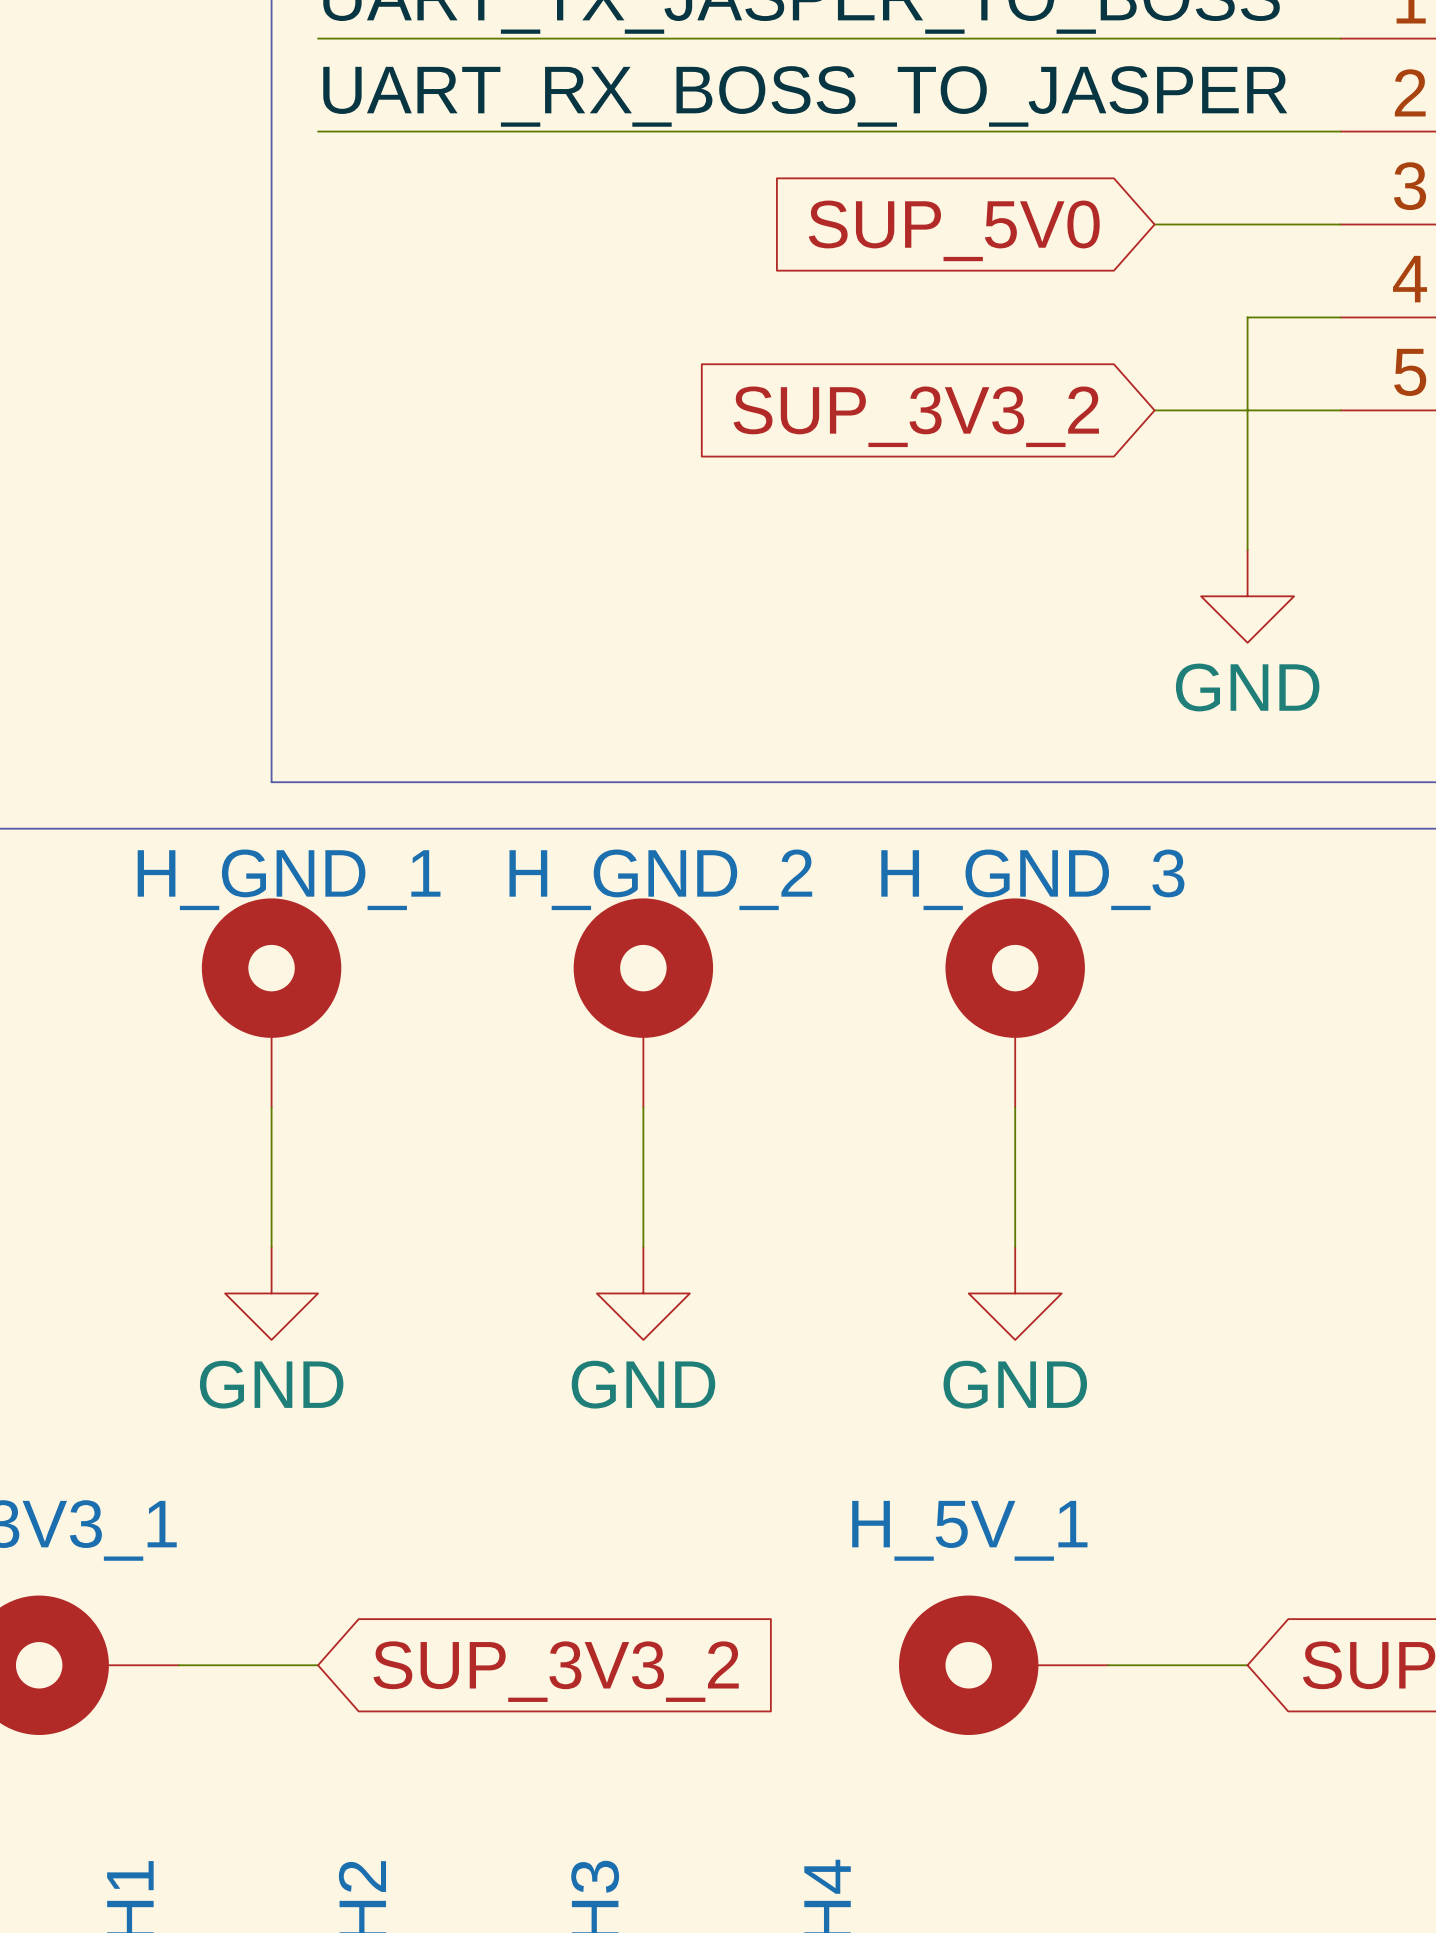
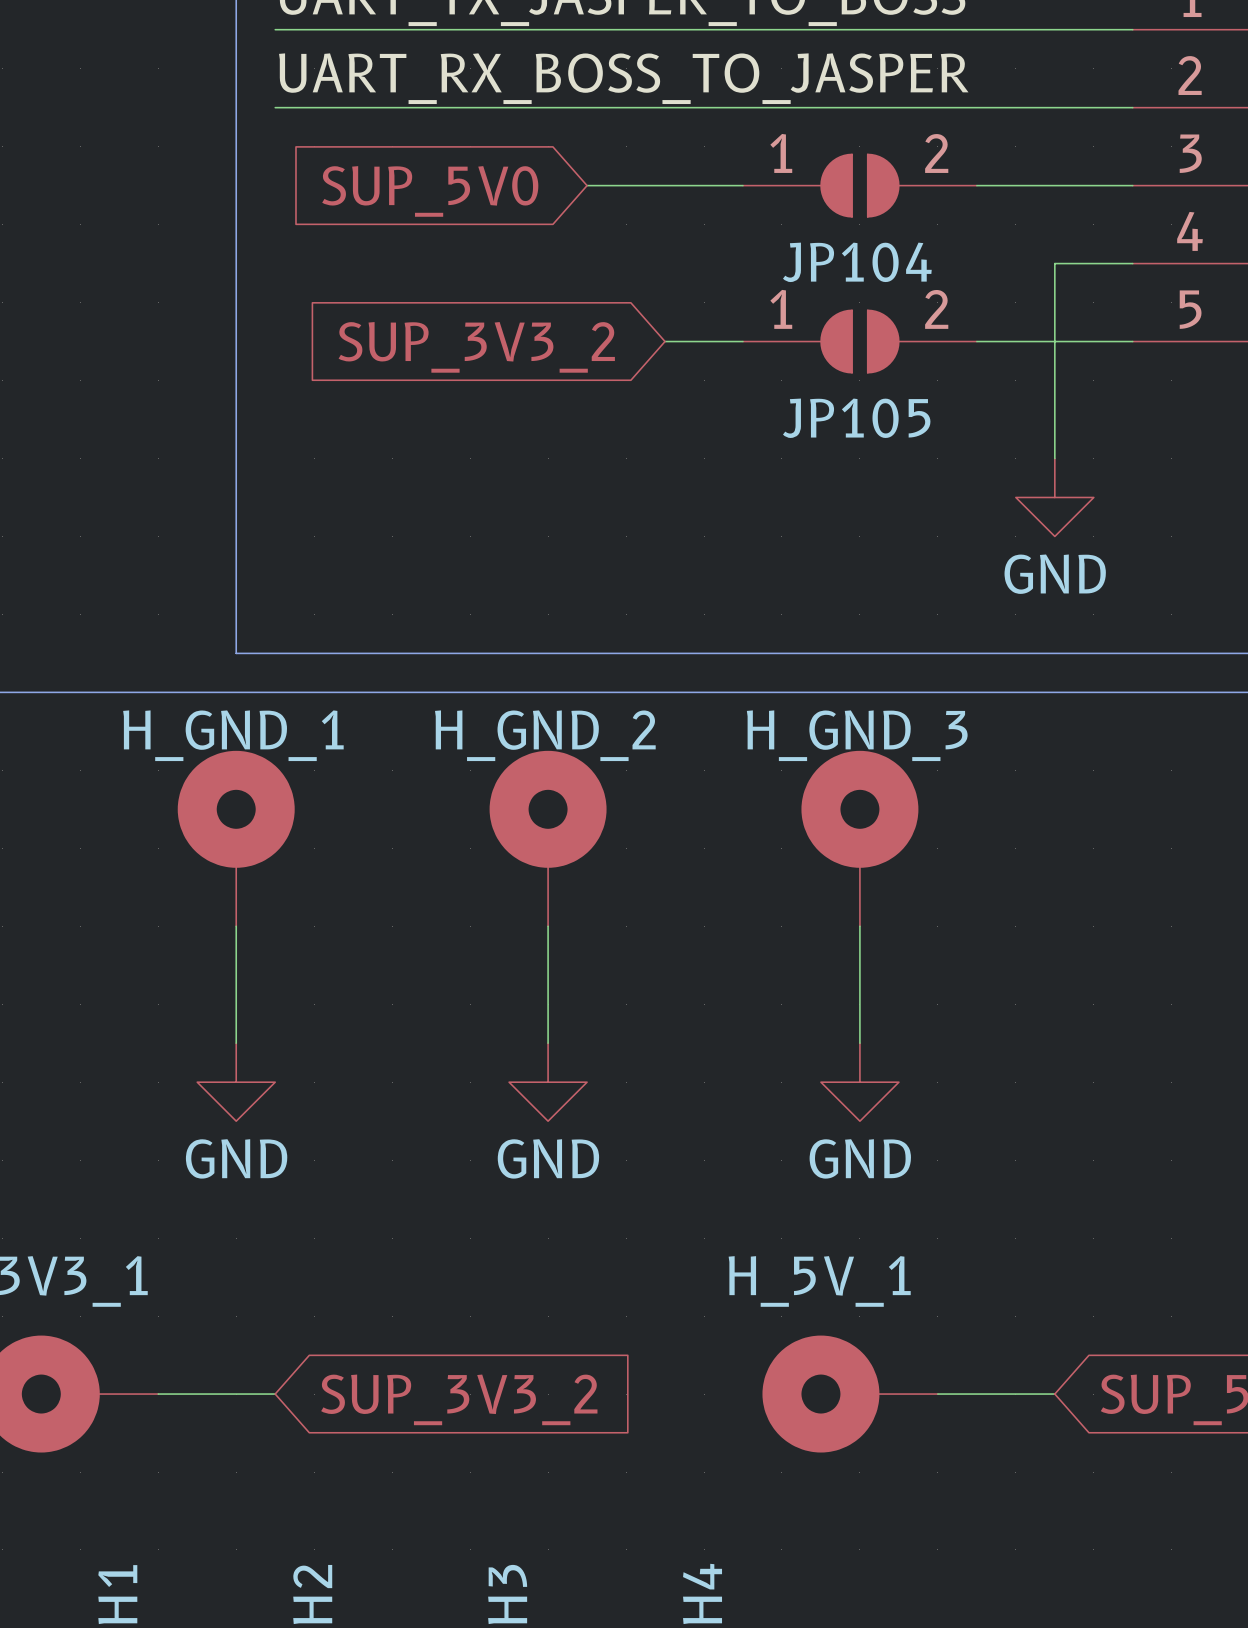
wire: none -> (587, 185) (742, 185)
JP104: none -> (859, 185)
global label position: SUP_5V0 (954, 230) -> SUP_5V0 (430, 191)
wire: none -> (665, 341) (742, 341)
JP105: none -> (859, 341)
global label position: SUP_3V3_2 (916, 416) -> SUP_3V3_2 (476, 347)

